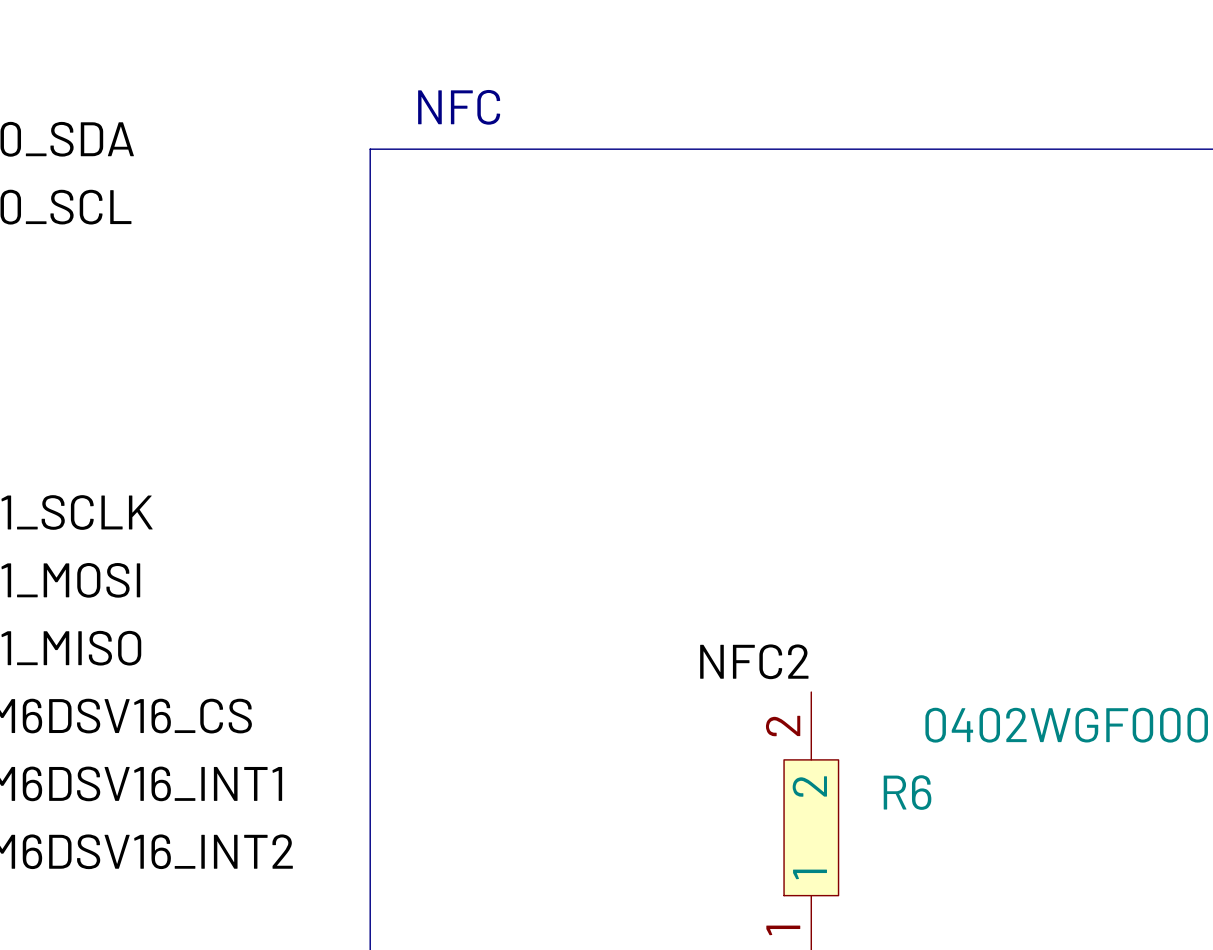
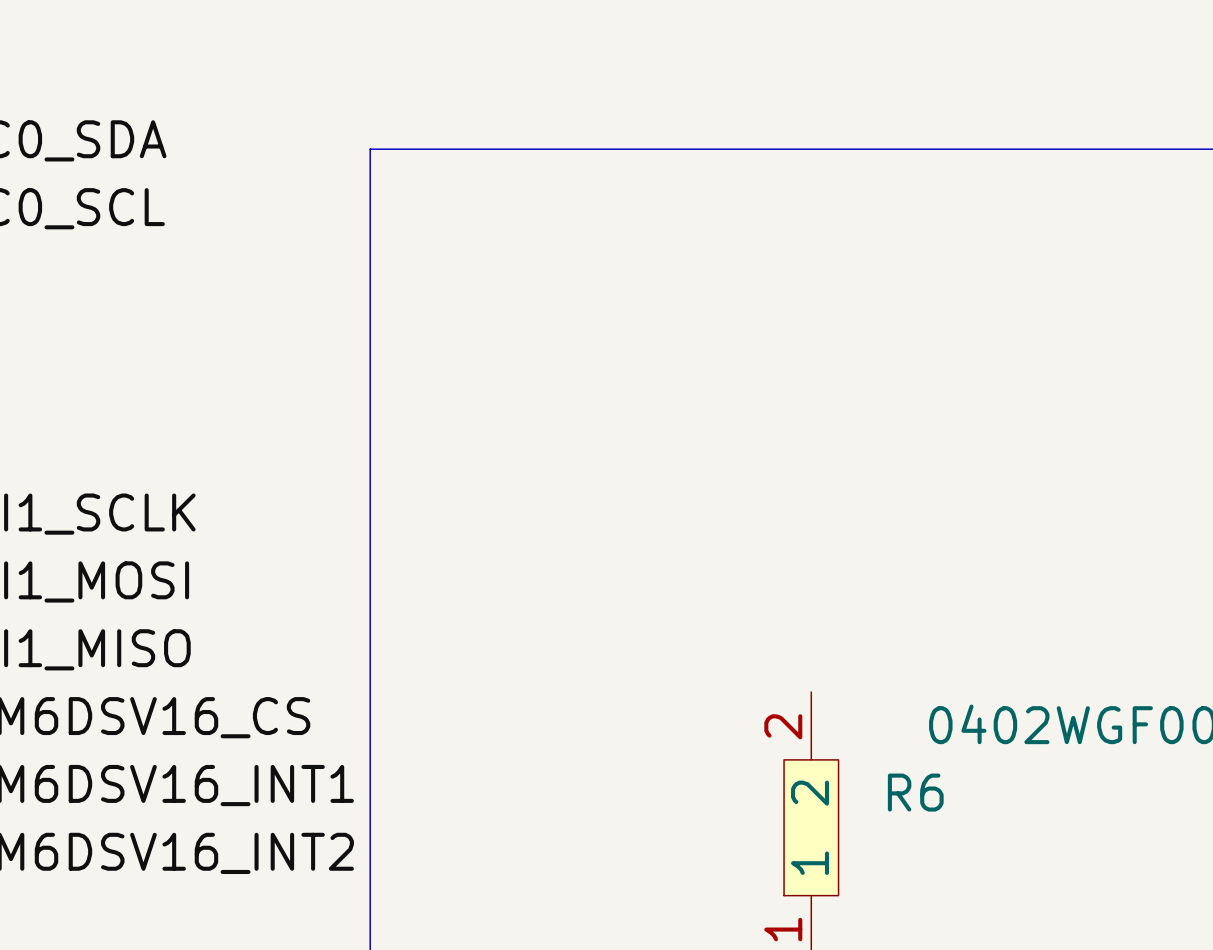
text: NFC (459, 107) -> none
label: NFC2 (754, 661) -> none

